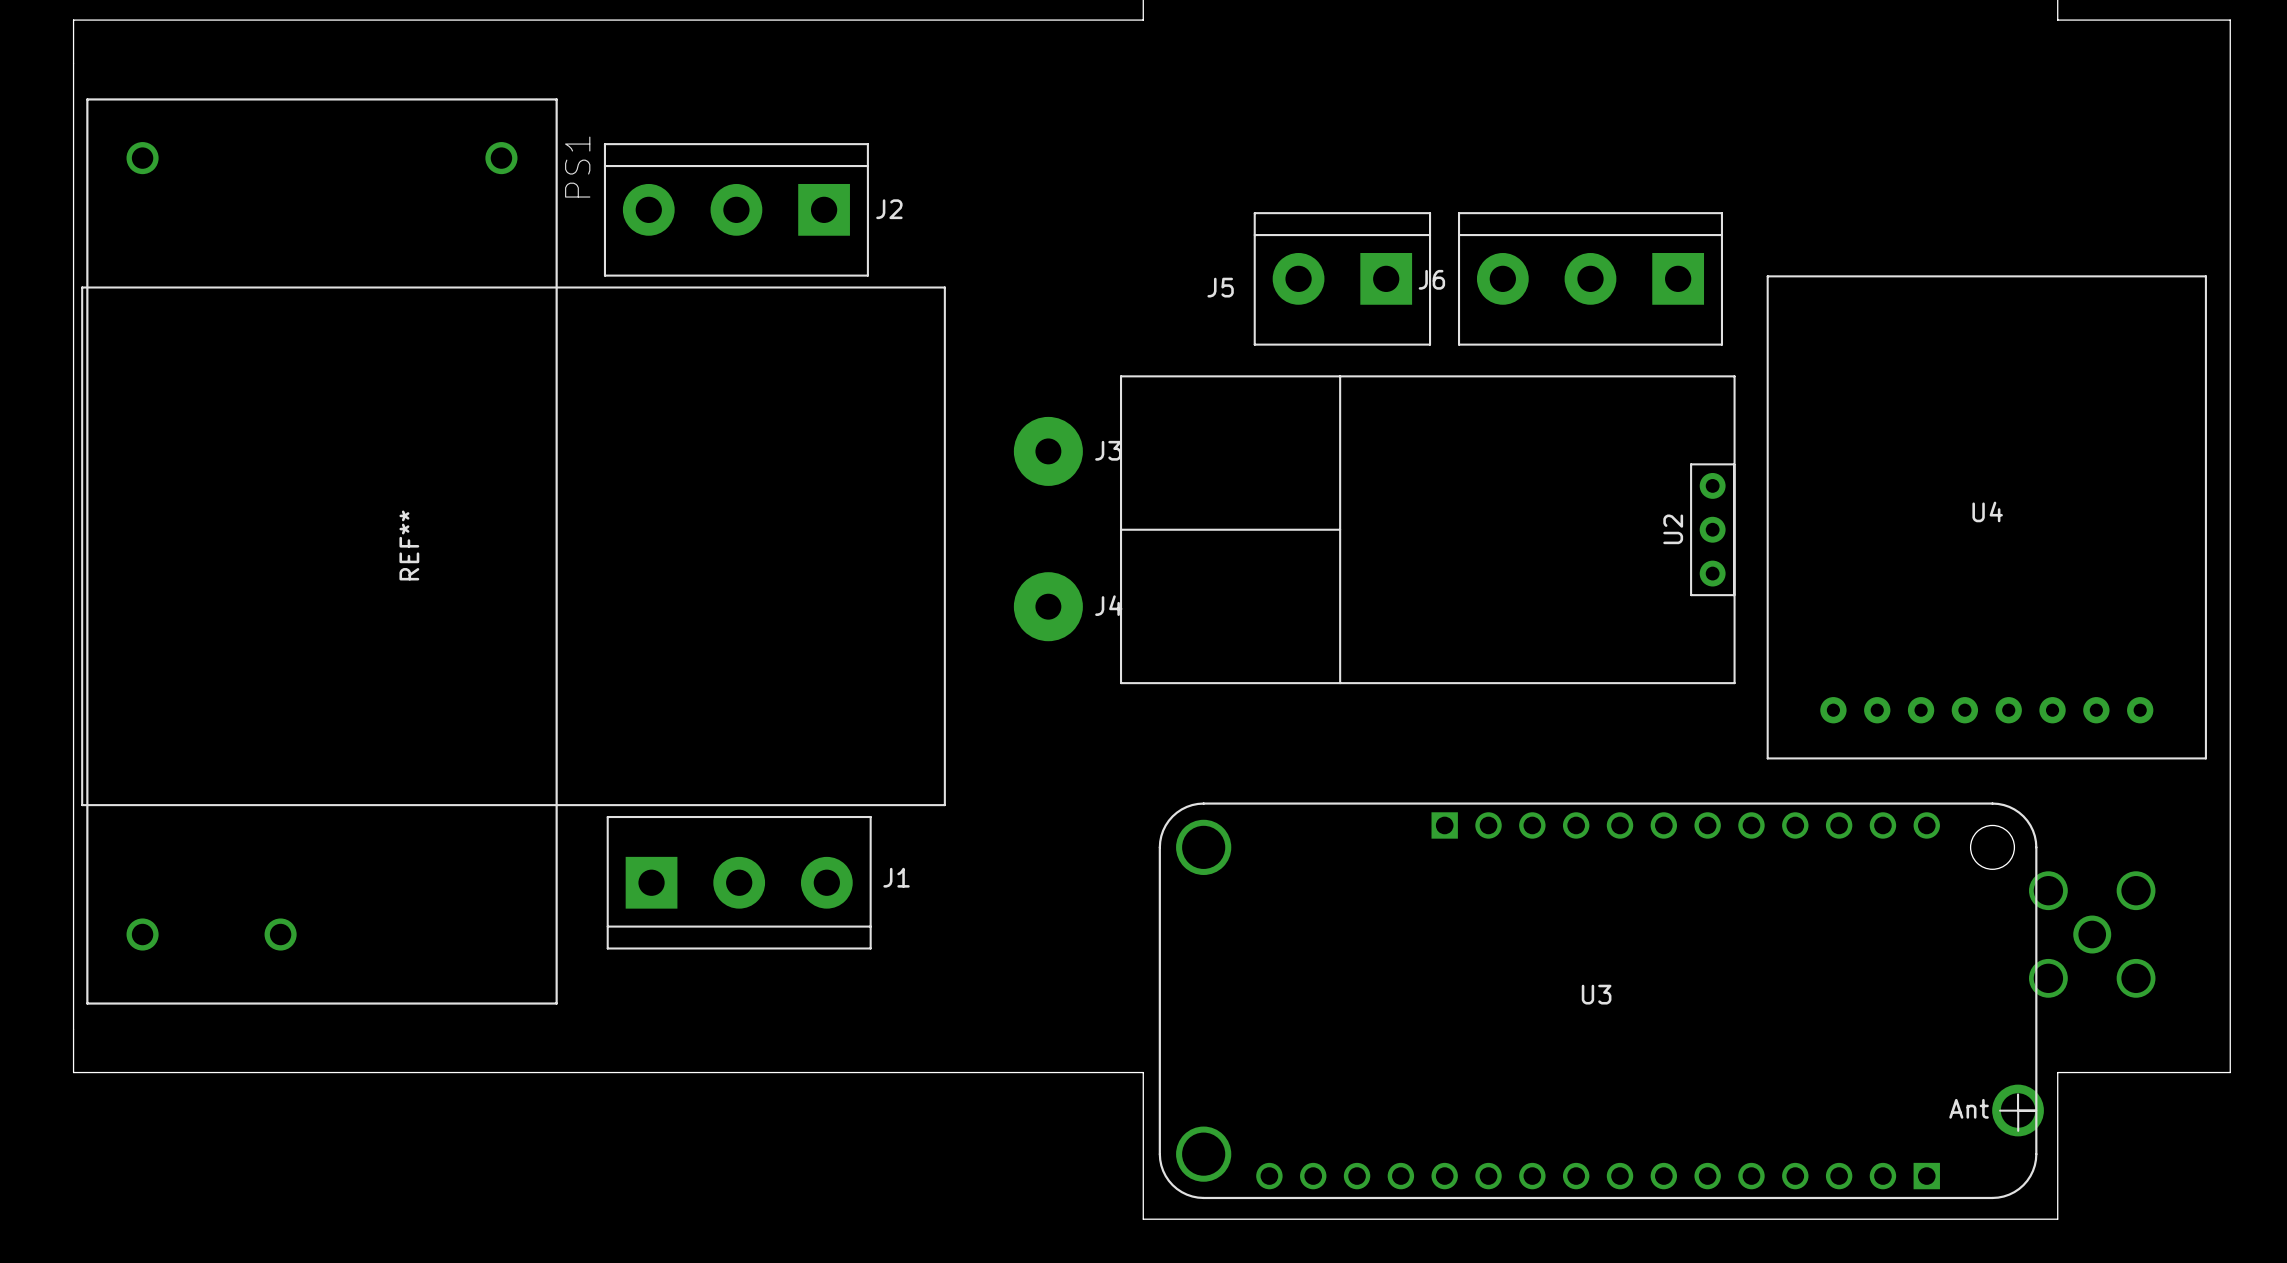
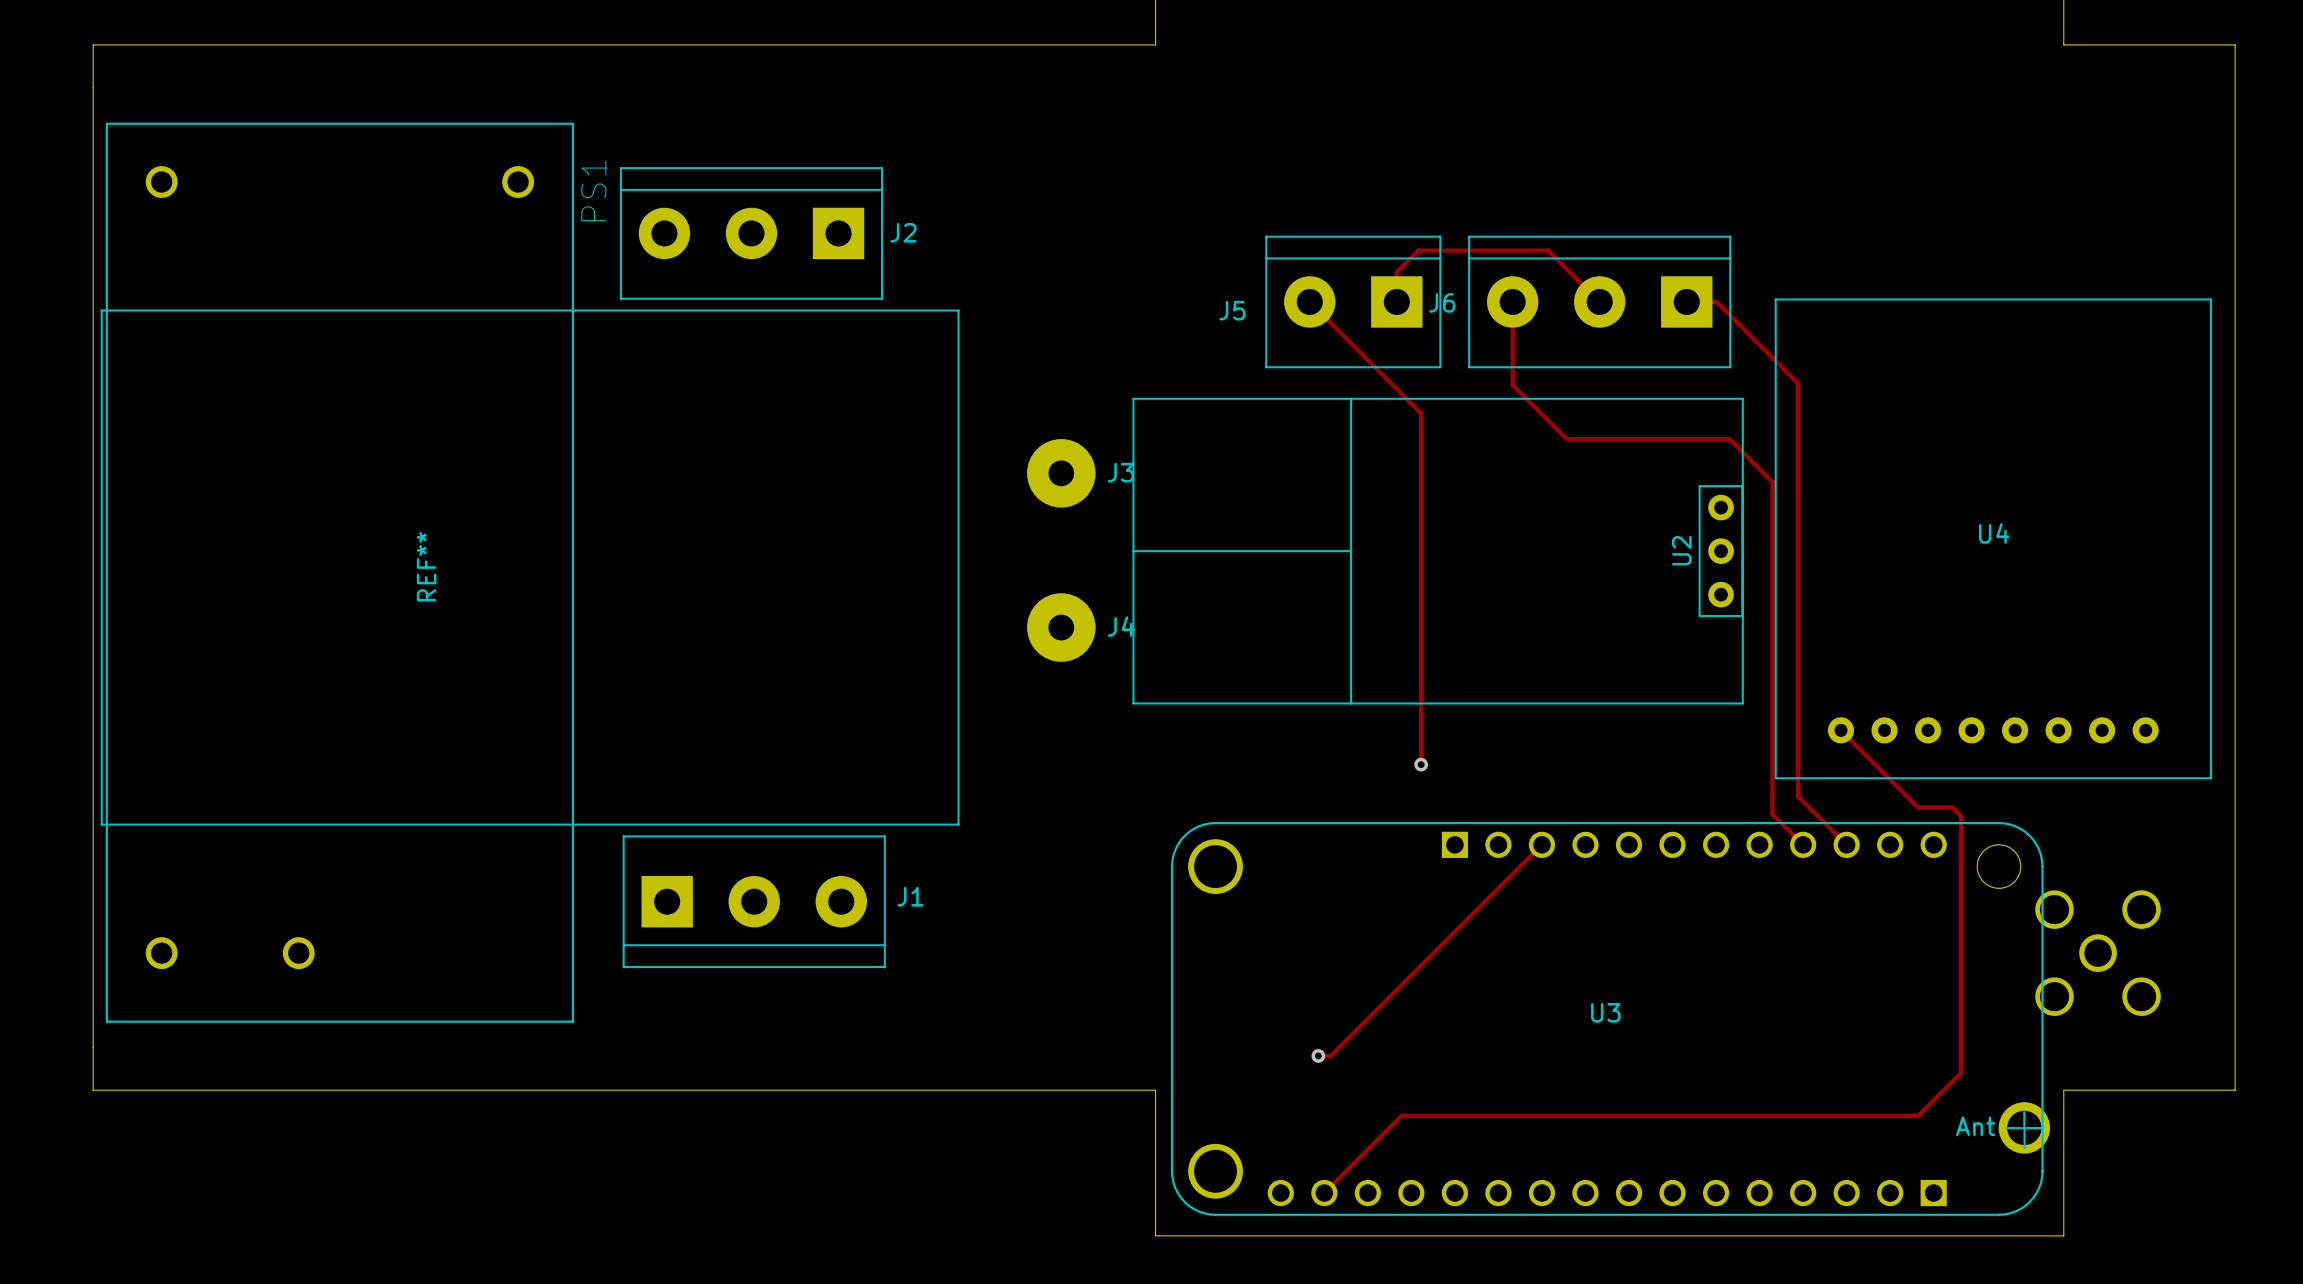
track: none -> (1309, 301) (1421, 413) (1421, 764)
track: none -> (1396, 301) (1396, 271) (1418, 250) (1548, 250) (1599, 301)
track: none -> (1512, 301) (1512, 384) (1566, 439) (1729, 439) (1772, 481) (1772, 814) (1803, 844)
track: none -> (1686, 301) (1716, 301) (1798, 383) (1798, 796) (1846, 844)
track: none -> (1840, 730) (1918, 807) (1952, 807) (1960, 816) (1960, 1073) (1918, 1115) (1401, 1115) (1324, 1193)
via: none -> (1421, 764)
track: none -> (1541, 844) (1330, 1055) (1318, 1055)
via: none -> (1318, 1055)

